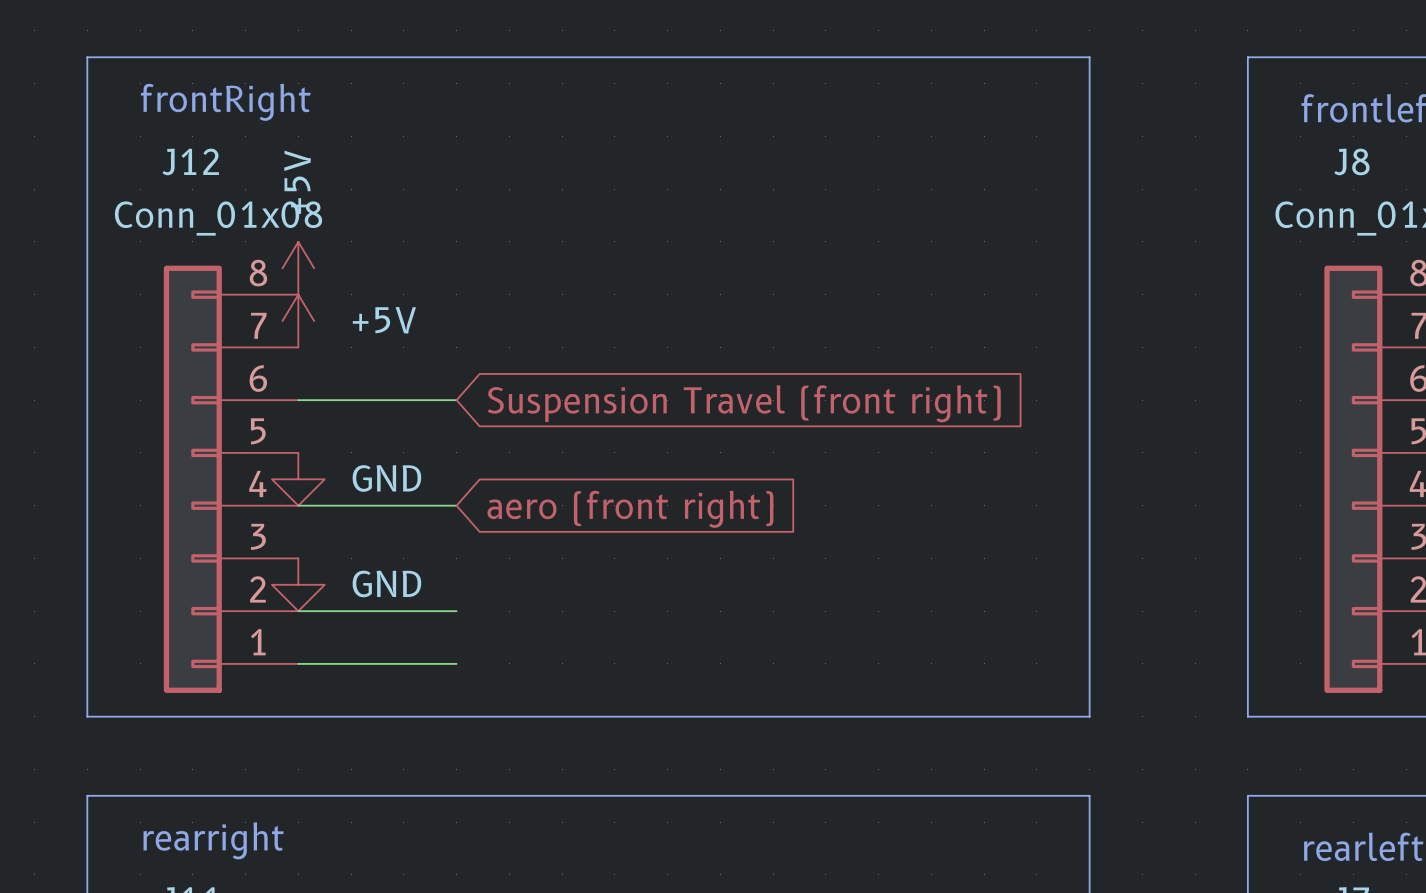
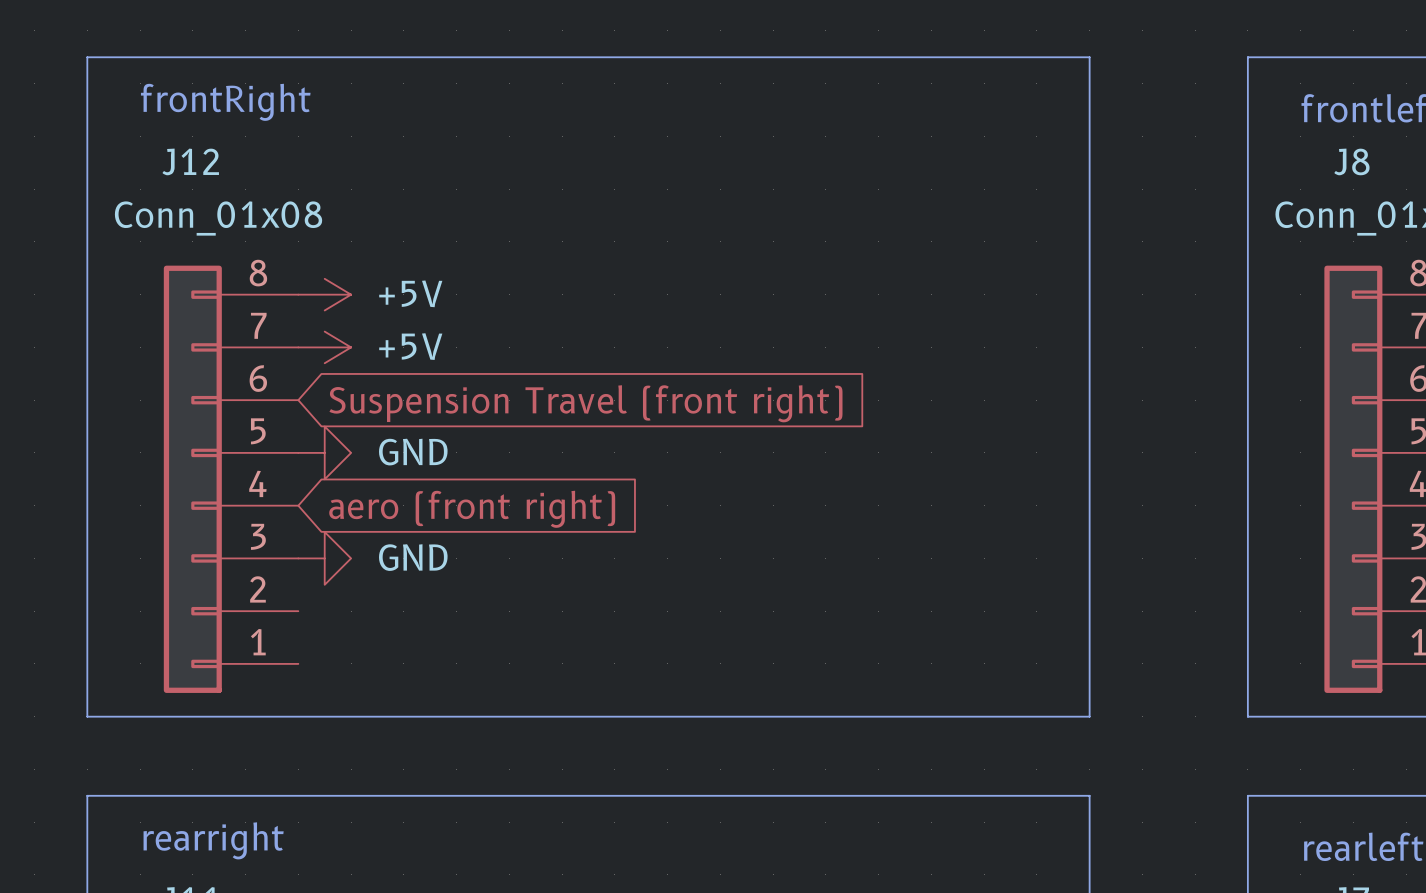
power symbol: +5V (298, 268) -> none
power symbol: none -> +5V (324, 294)
power symbol: +5V (298, 321) -> none
power symbol: none -> +5V (324, 347)
wire: (298, 400) (456, 400) -> none
global label position: Suspension Travel (front right) (744, 403) -> Suspension Travel (front right) (585, 403)
power symbol rotation: 0° (298, 479) -> 90° counterclockwise (324, 452)
power symbol position: GND (298, 479) -> GND (324, 452)
wire: (298, 505) (456, 505) -> none
global label position: aero (front right) (630, 509) -> aero (front right) (472, 509)
power symbol rotation: 0° (298, 584) -> 90° counterclockwise (324, 558)
power symbol position: GND (298, 584) -> GND (324, 558)
wire: (298, 611) (456, 611) -> none
wire: (298, 663) (456, 663) -> none

